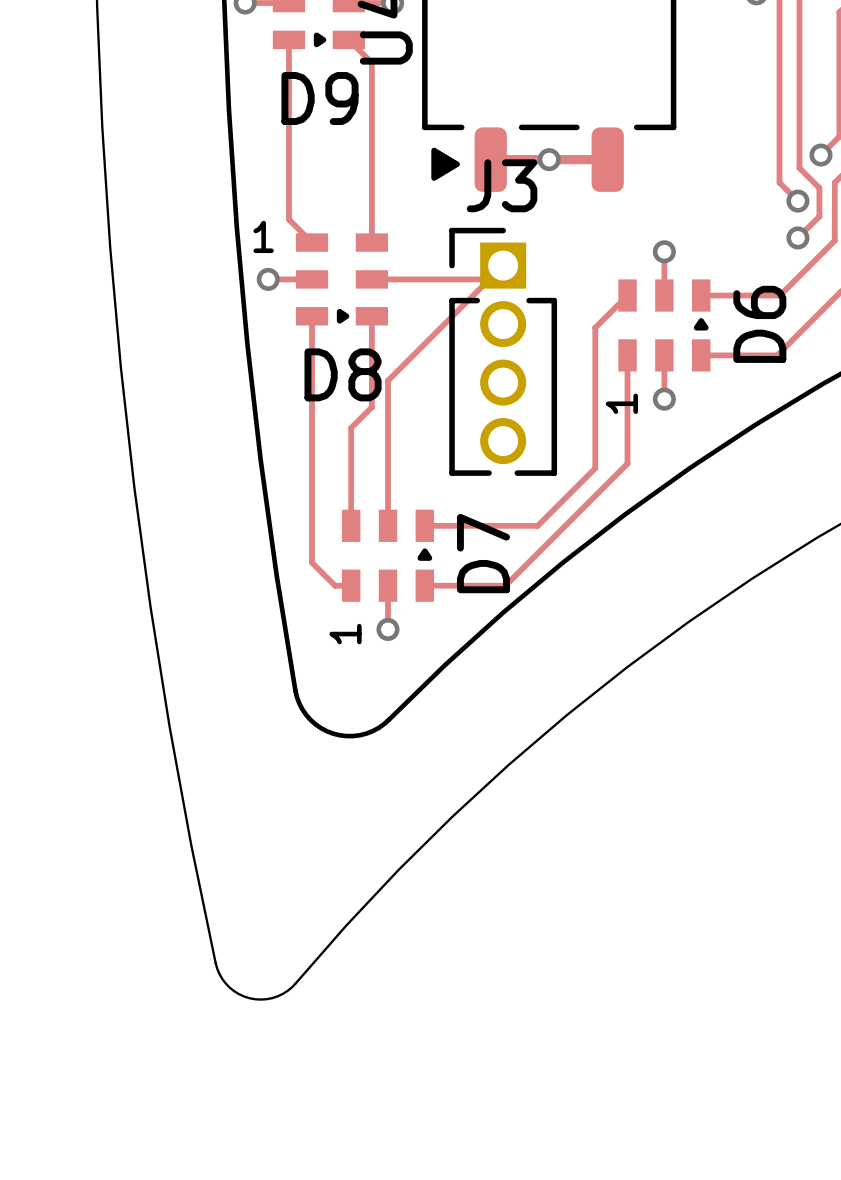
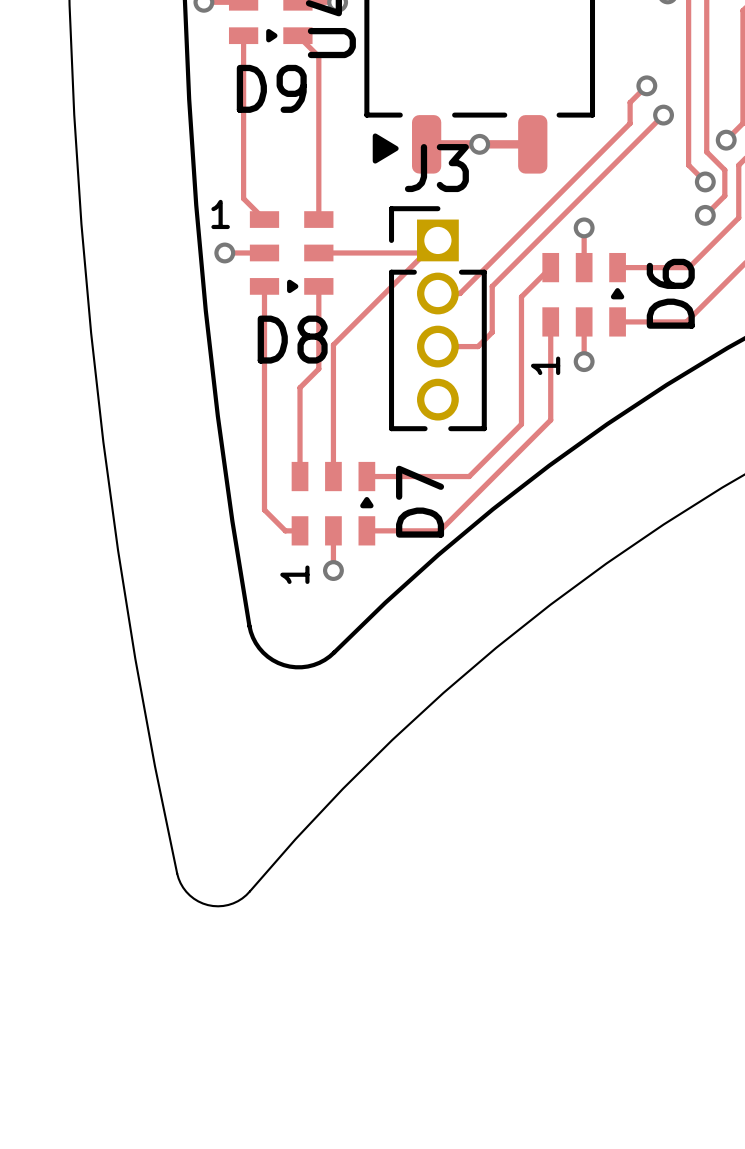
track: none -> (646, 85) (630, 102) (630, 123) (460, 293) (437, 293)
via: none -> (646, 85)
track: none -> (663, 115) (492, 286) (492, 332) (478, 346) (437, 346)
via: none -> (663, 115)

